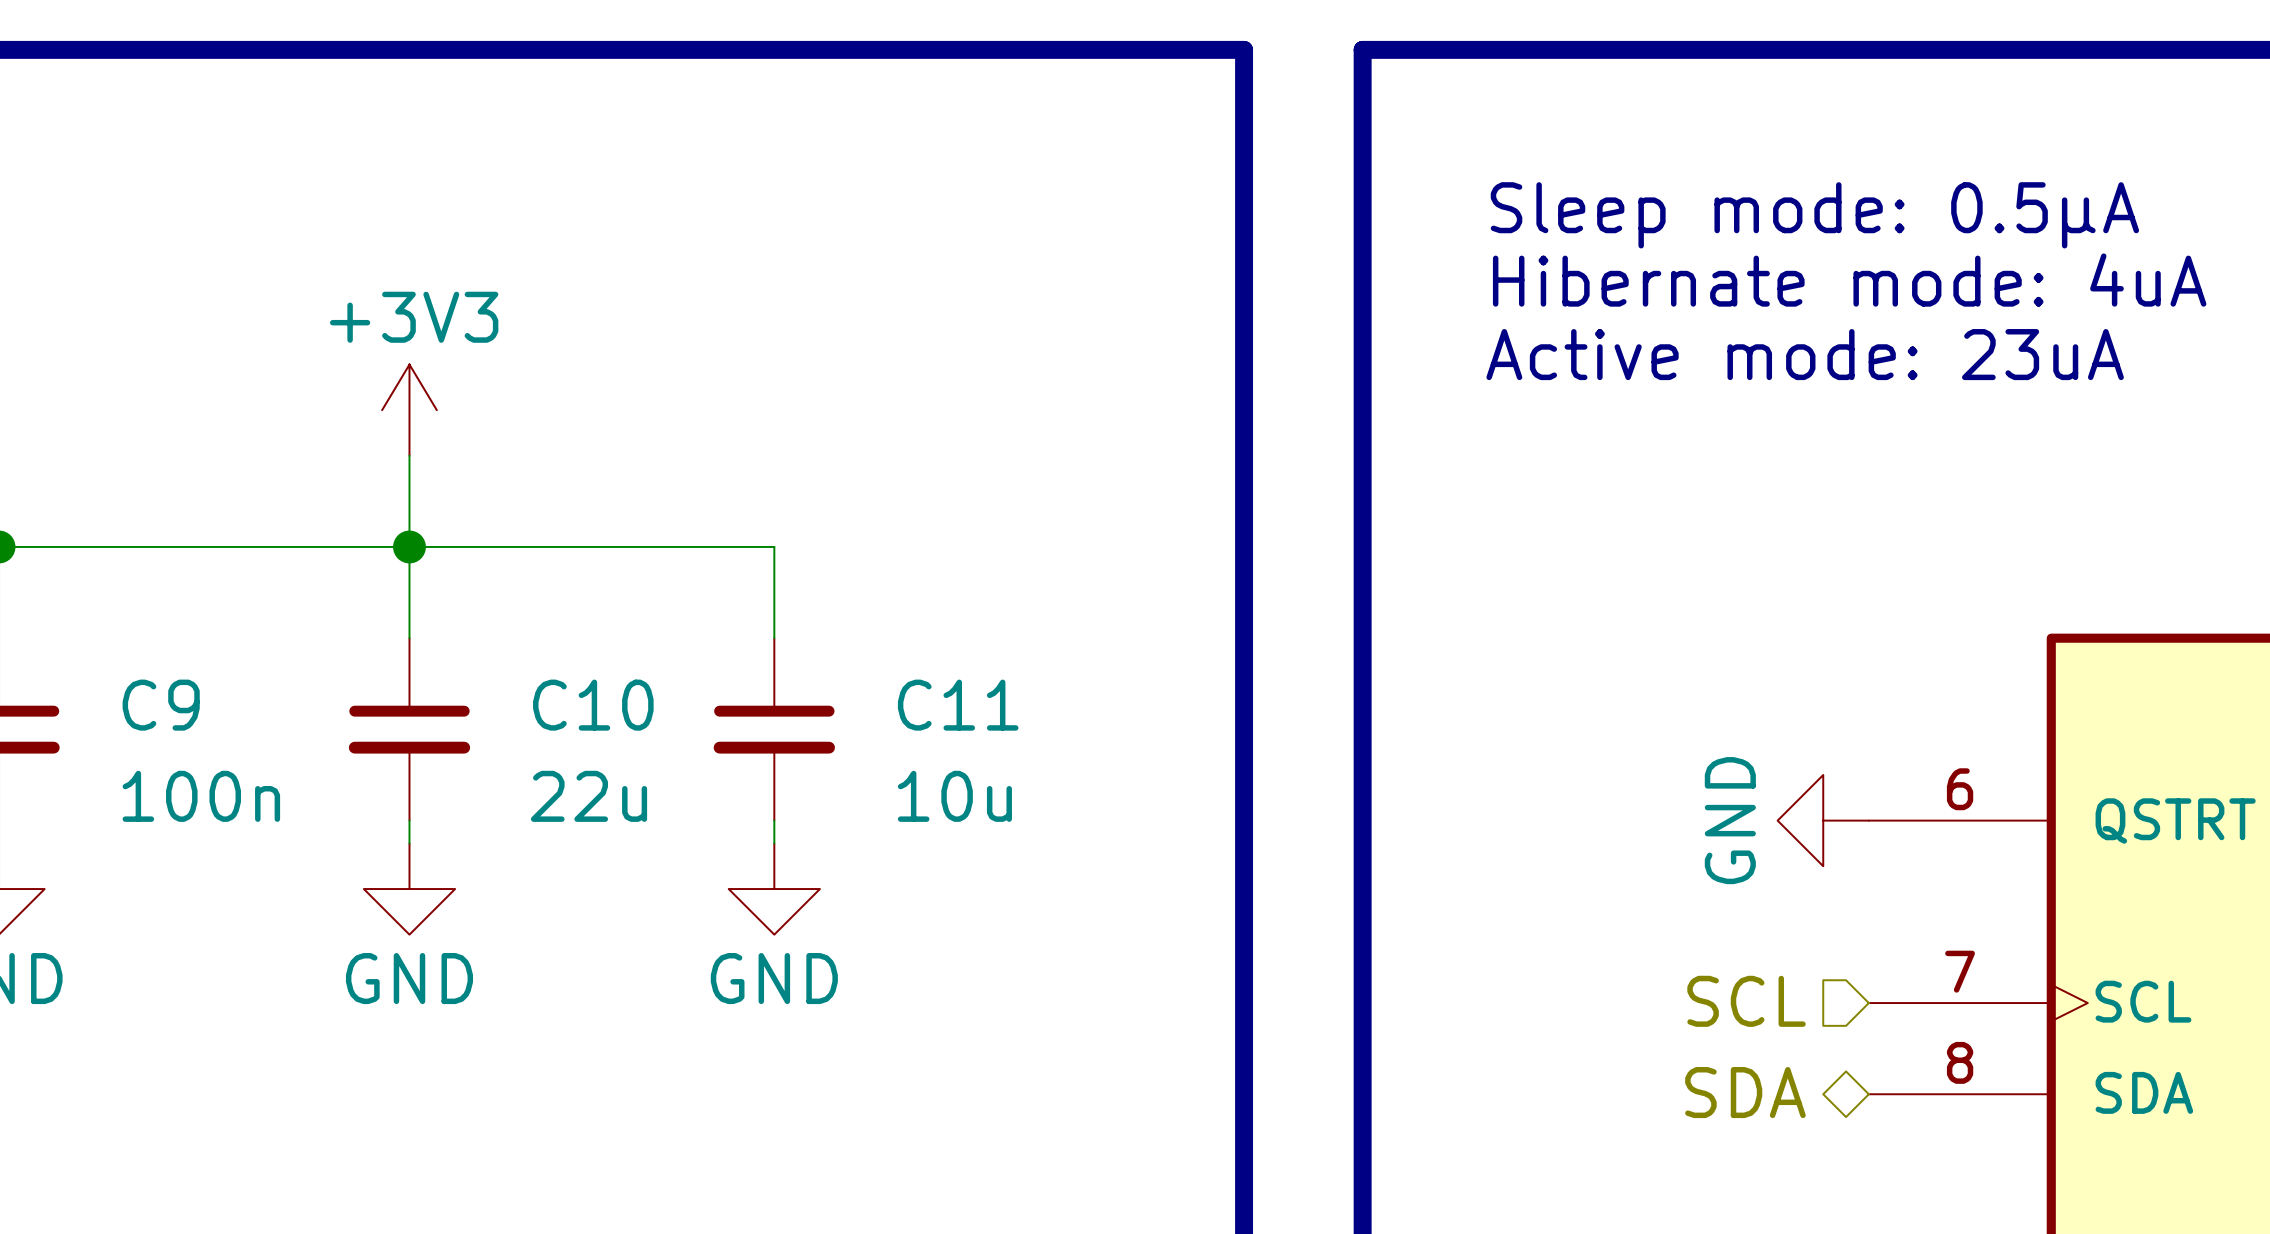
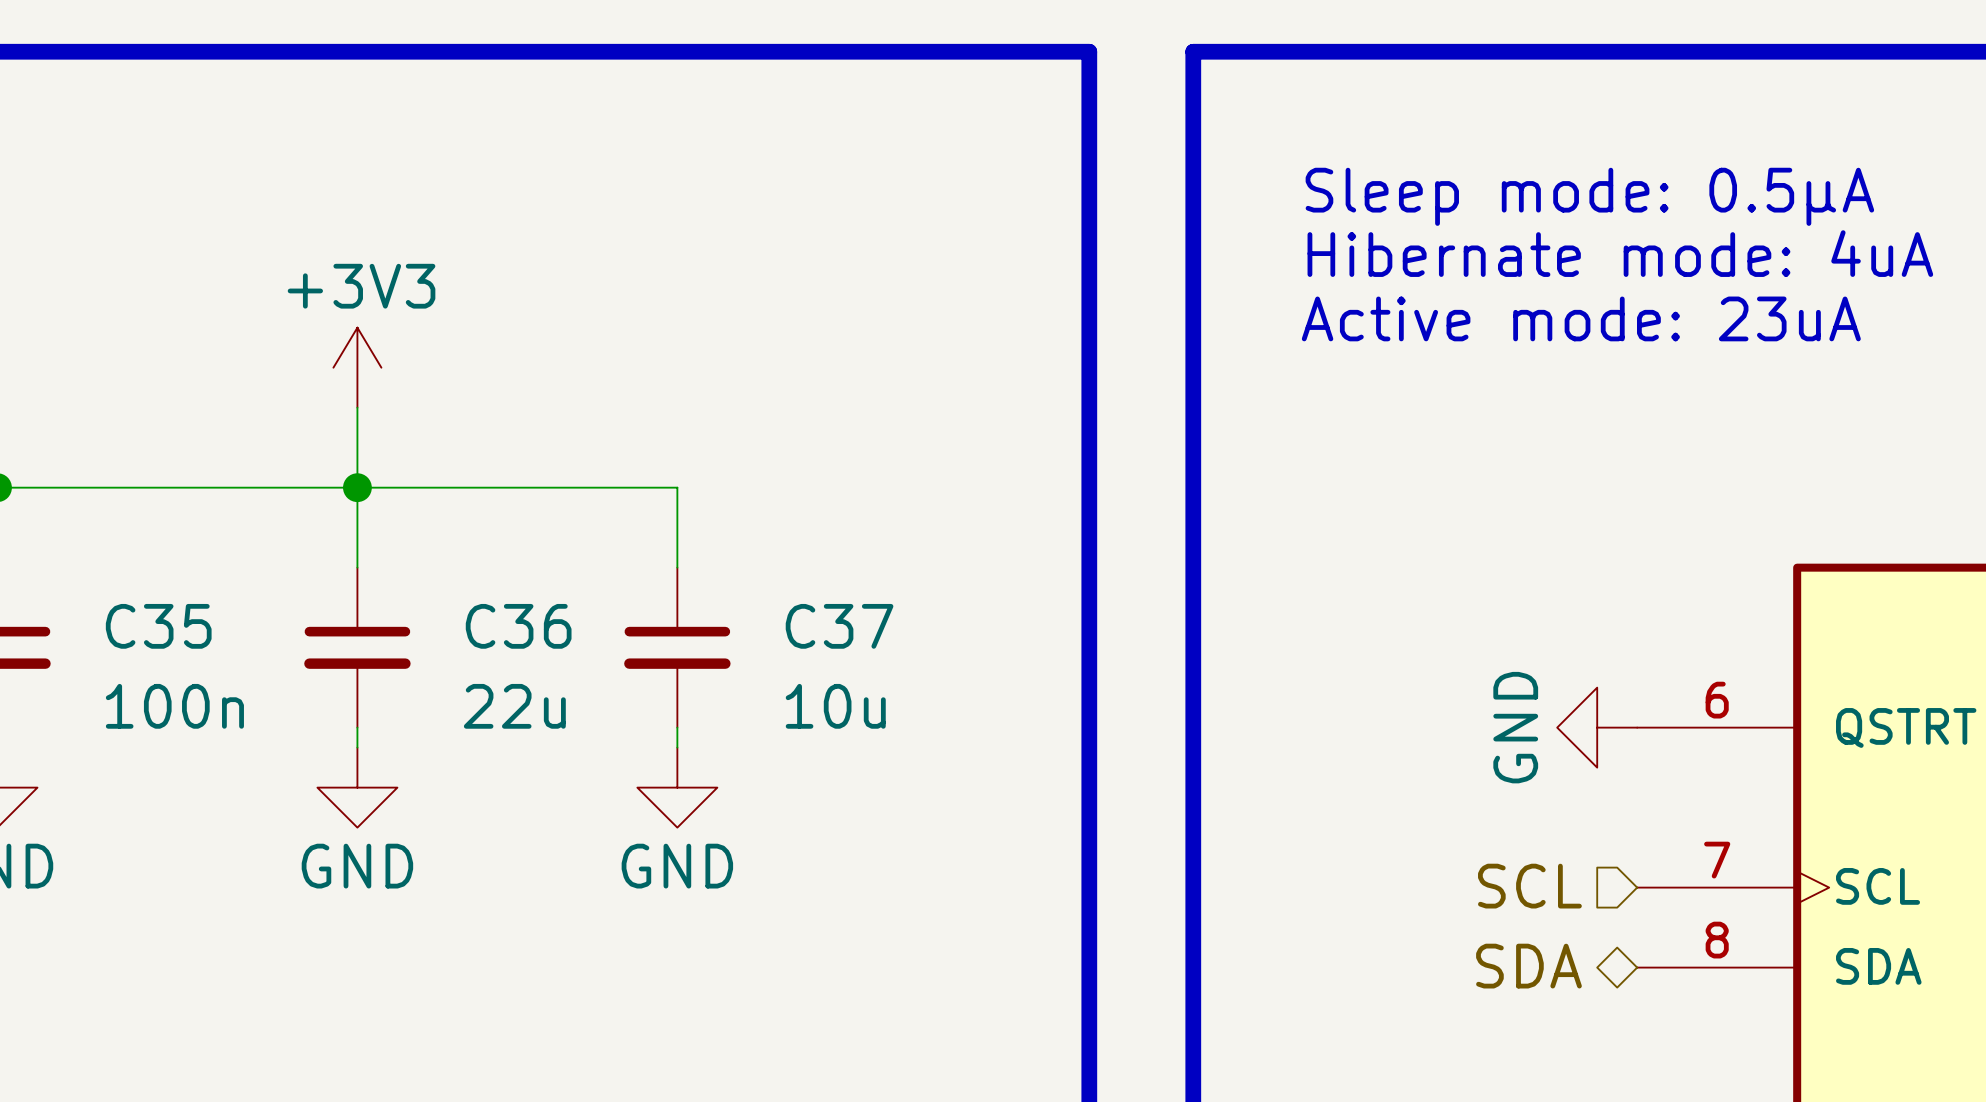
C9 name: C9 (161, 705) -> C35 (158, 626)
C10 name: C10 (593, 705) -> C36 (518, 626)
C11 name: C11 (958, 705) -> C37 (839, 626)

